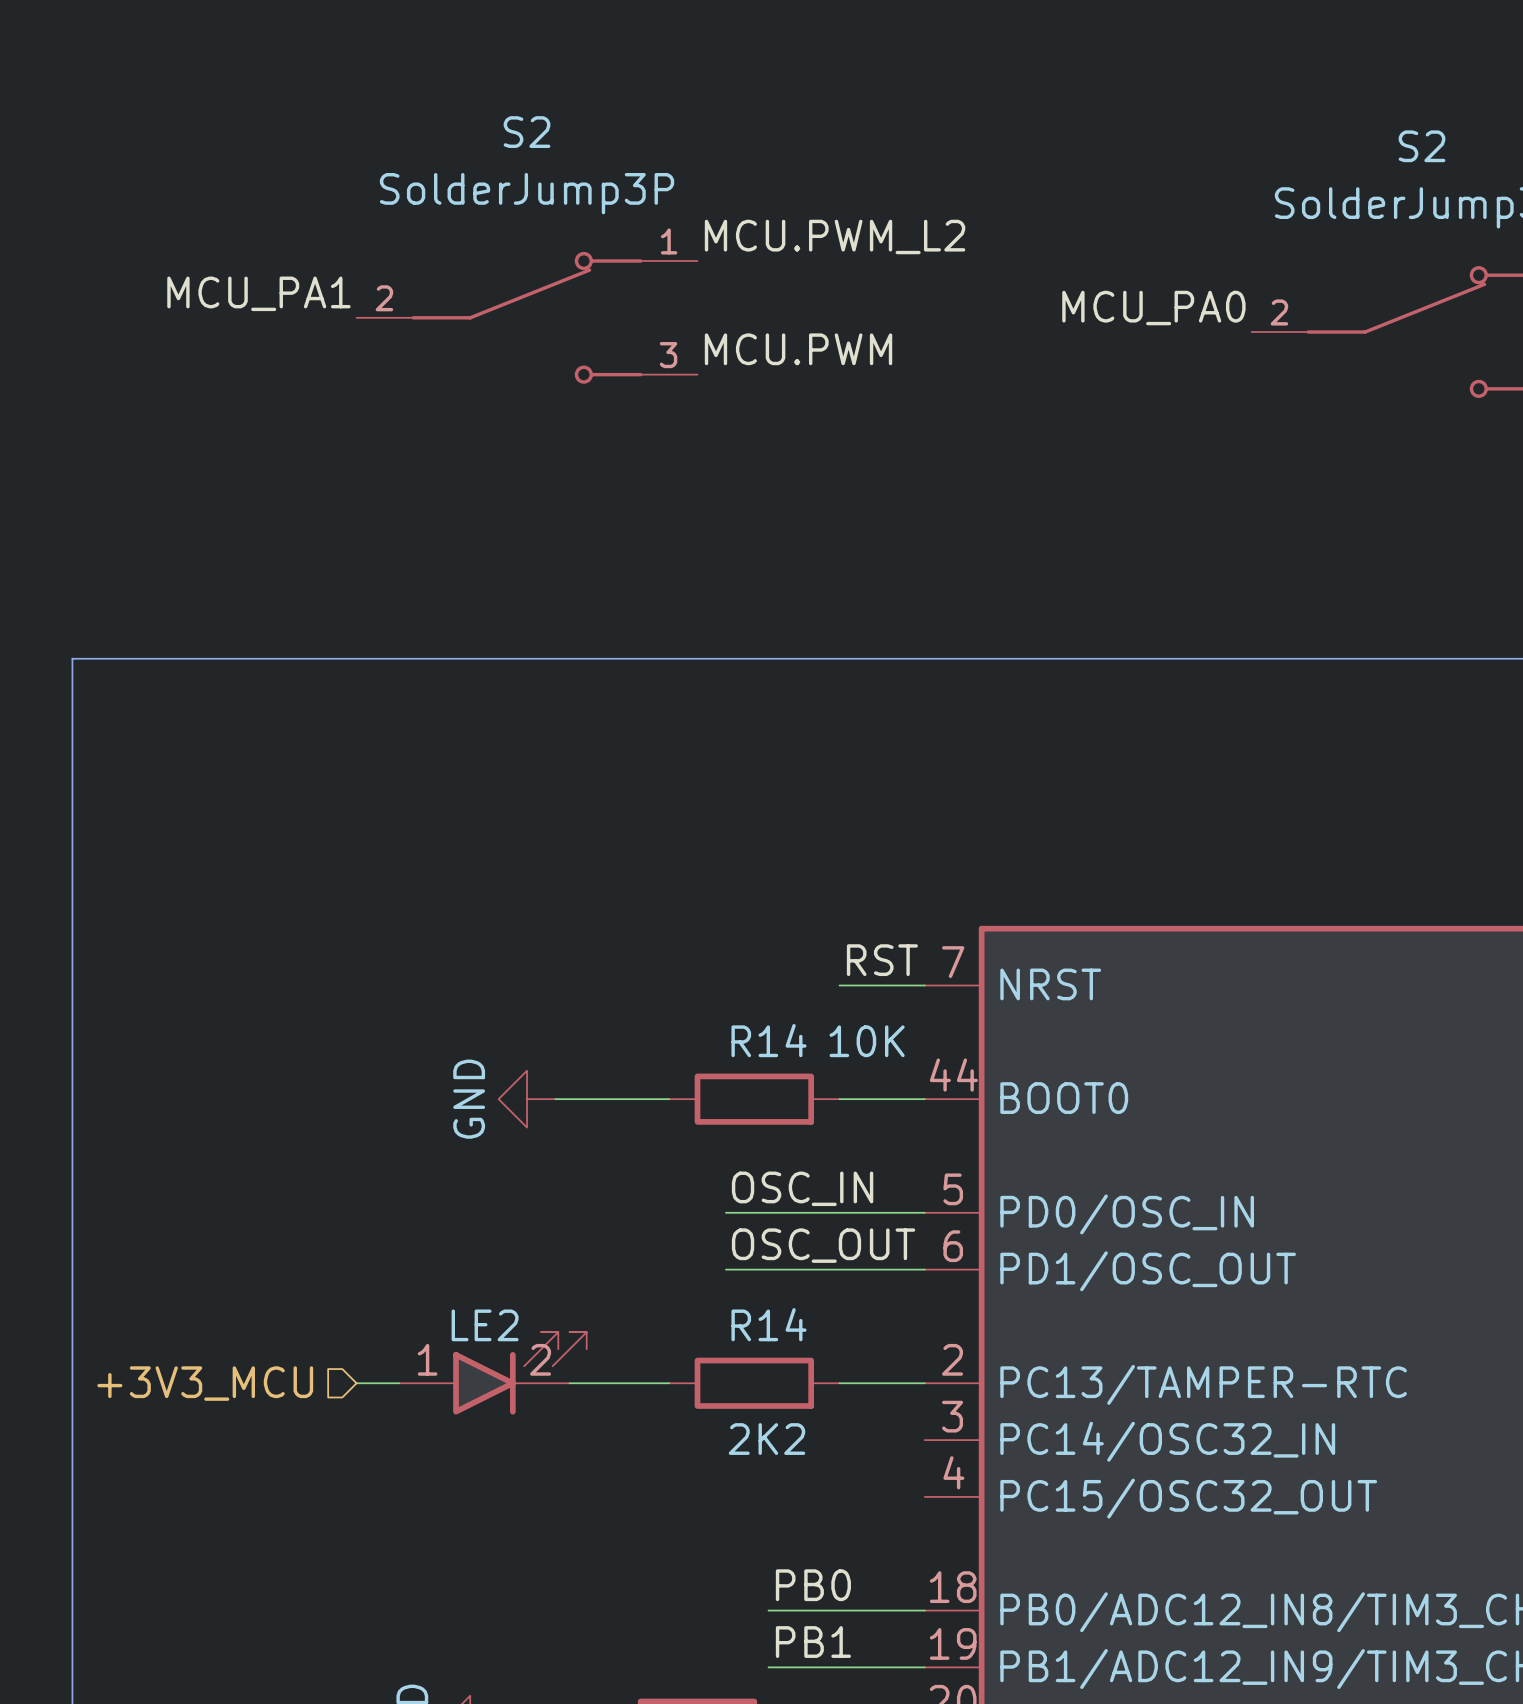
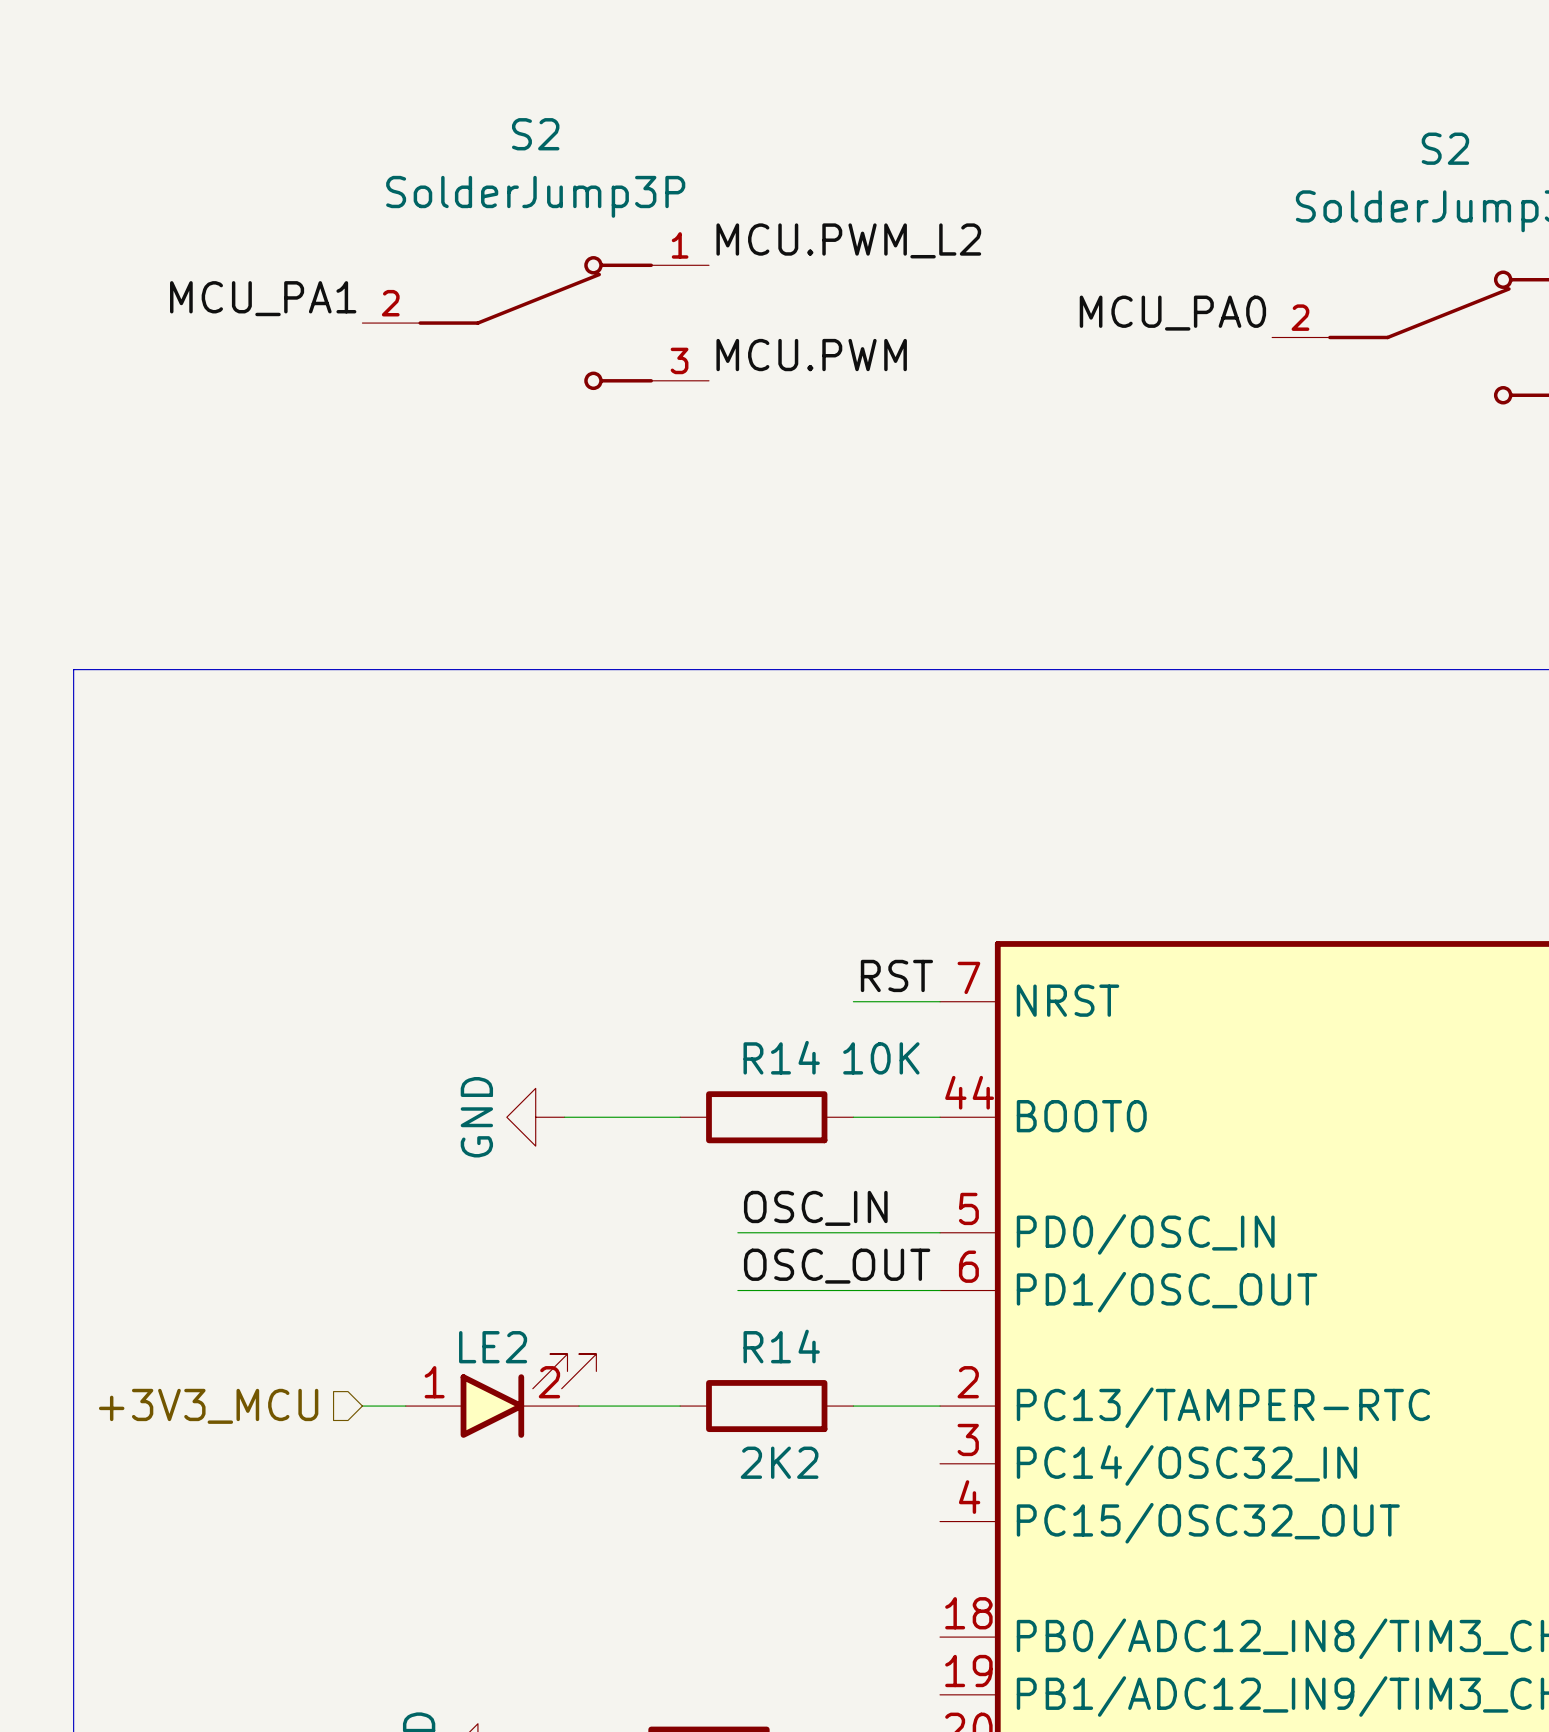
label: PB0 (813, 1585) -> none
wire: (768, 1610) (924, 1610) -> none
label: PB1 (813, 1642) -> none
wire: (768, 1667) (924, 1667) -> none

